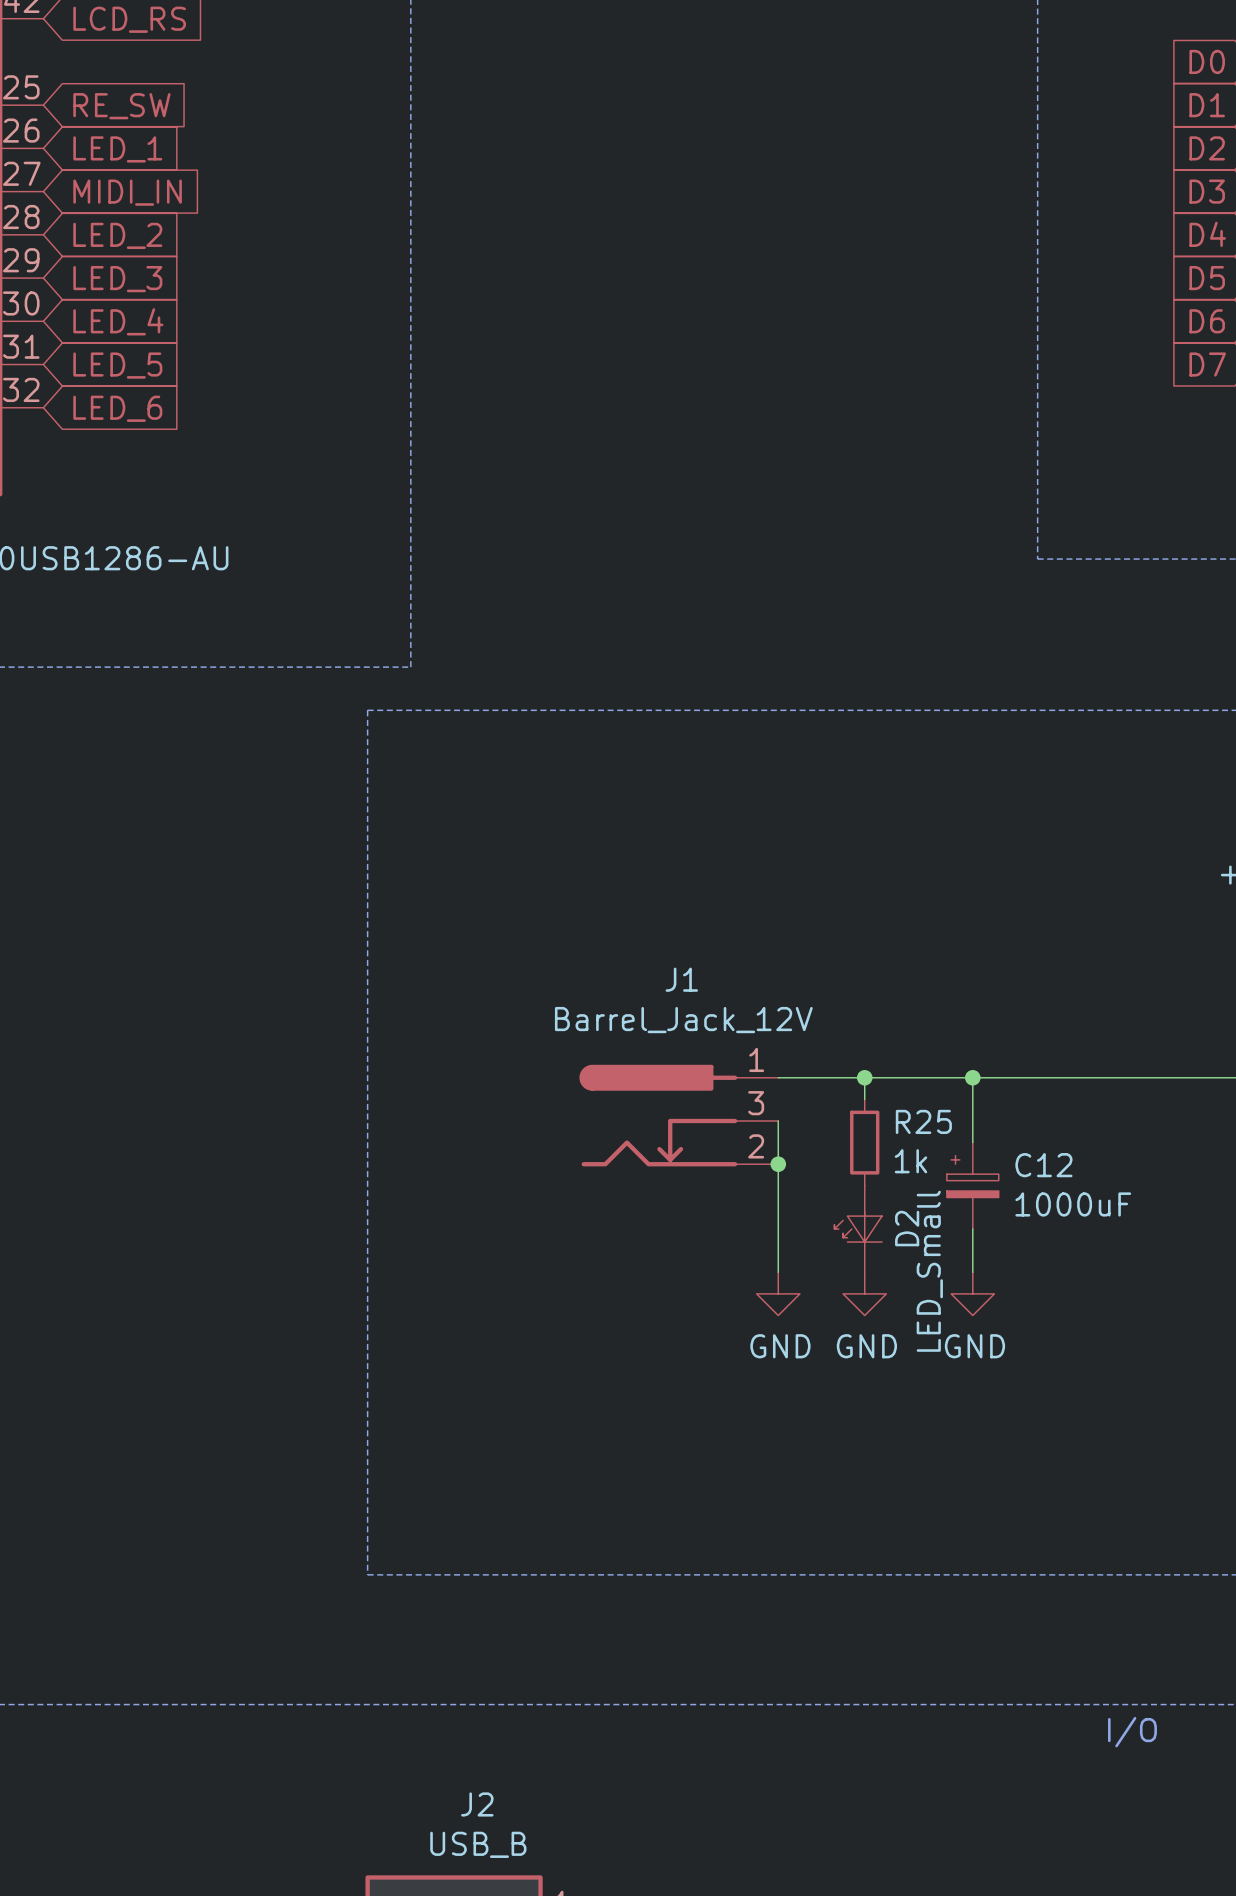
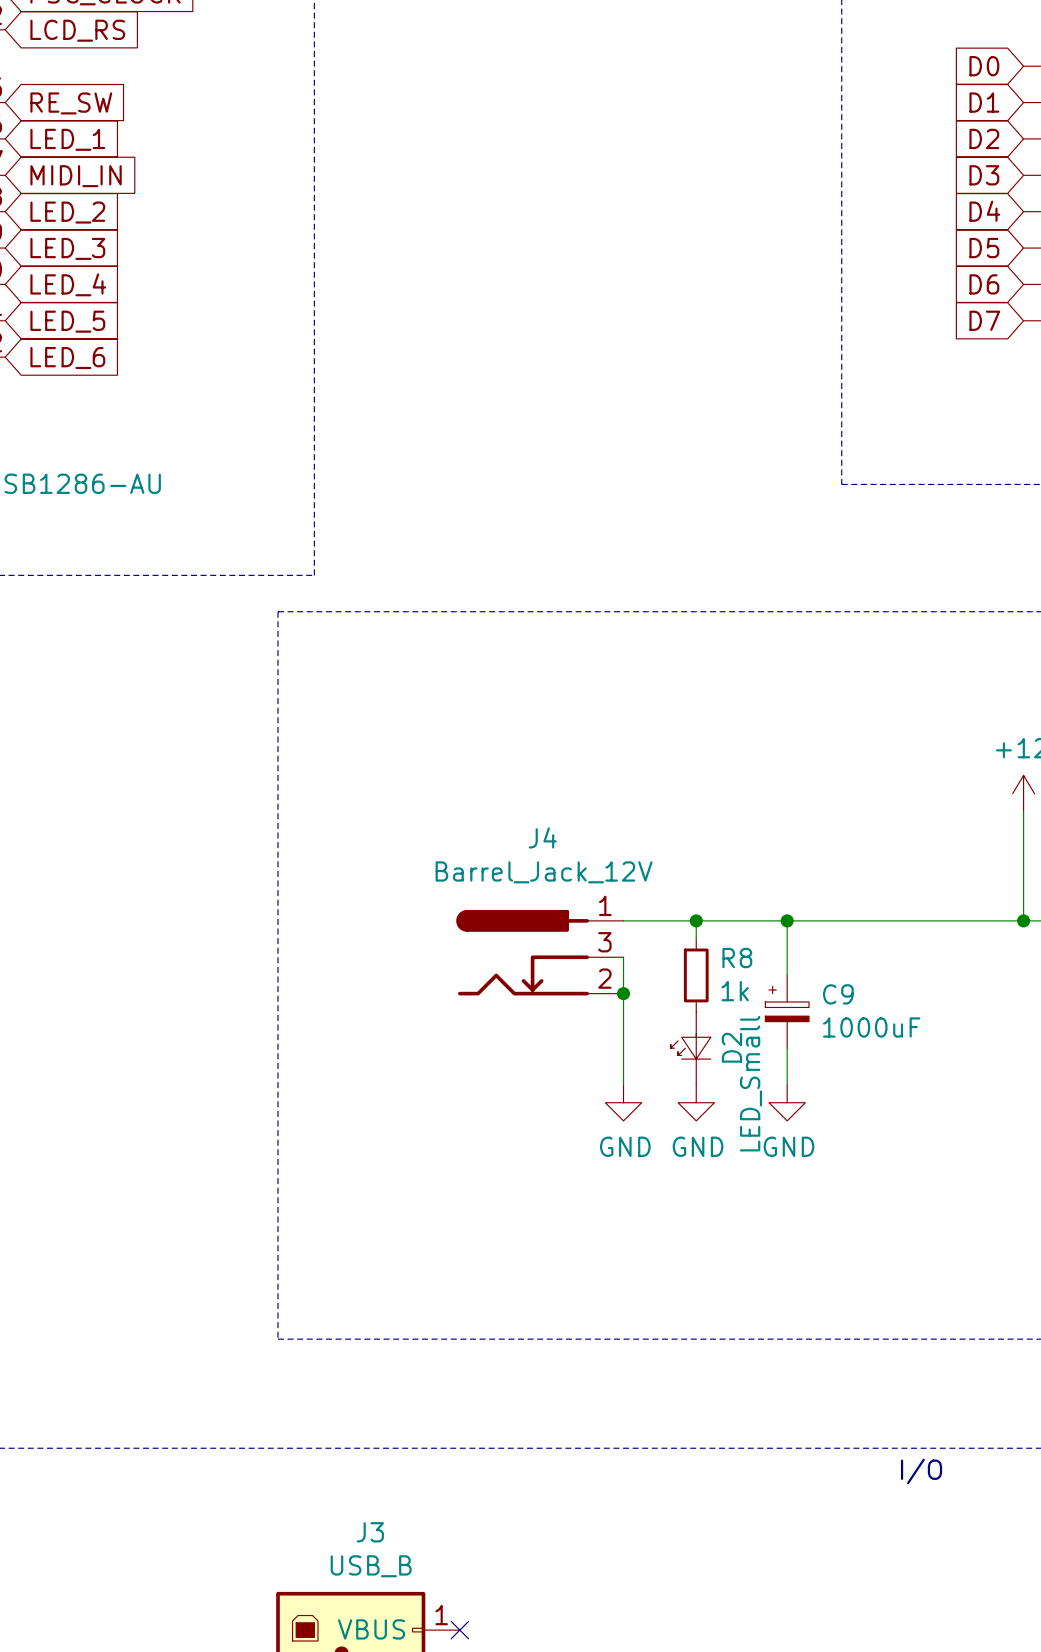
J1 name: J1 (681, 979) -> J4 (542, 837)
R25 name: R25 (923, 1121) -> R8 (737, 958)
C12 name: C12 (1043, 1165) -> C9 (838, 994)
J2 name: J2 (477, 1804) -> J3 (370, 1532)

